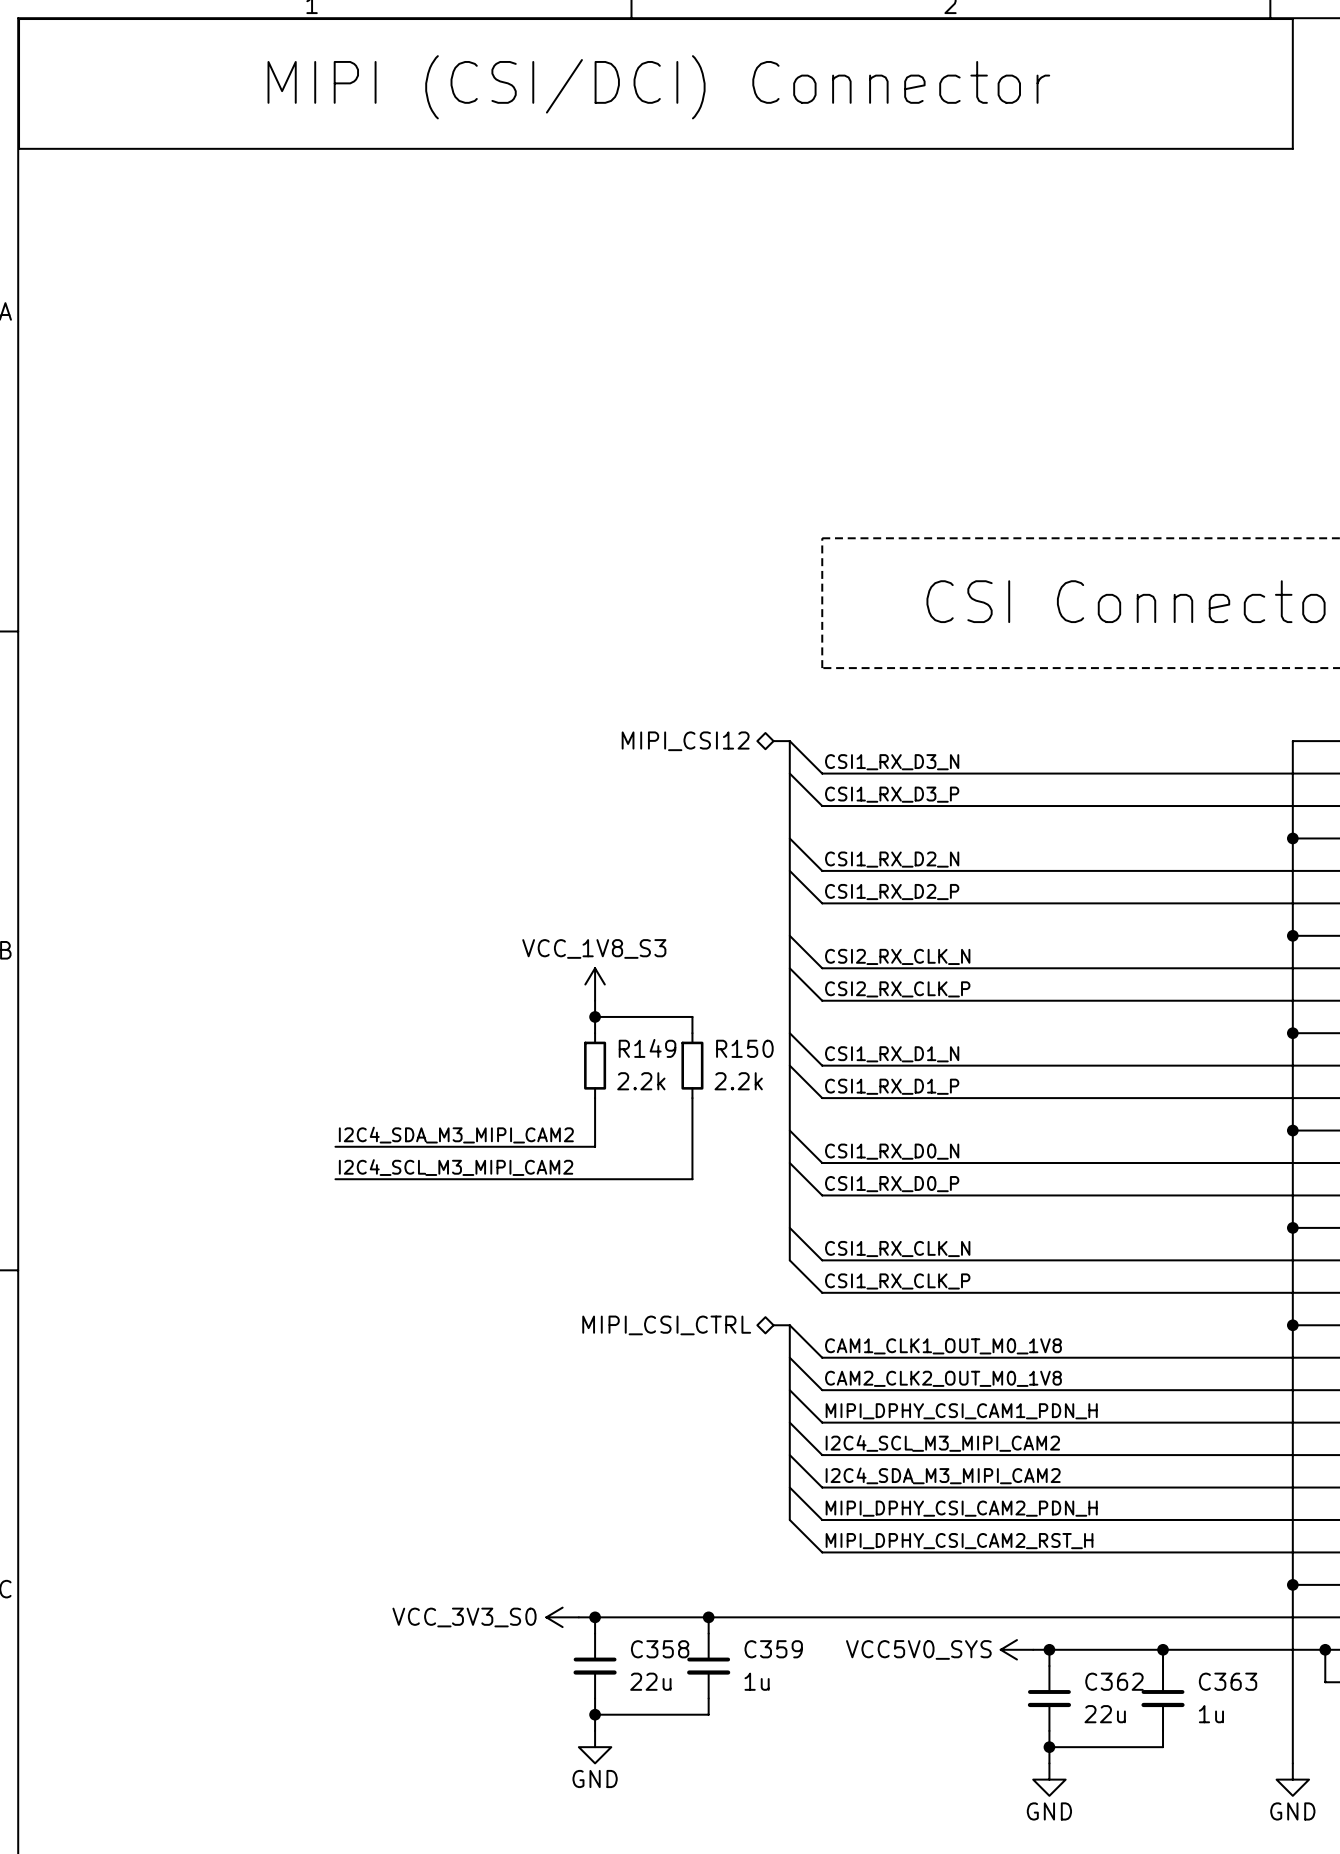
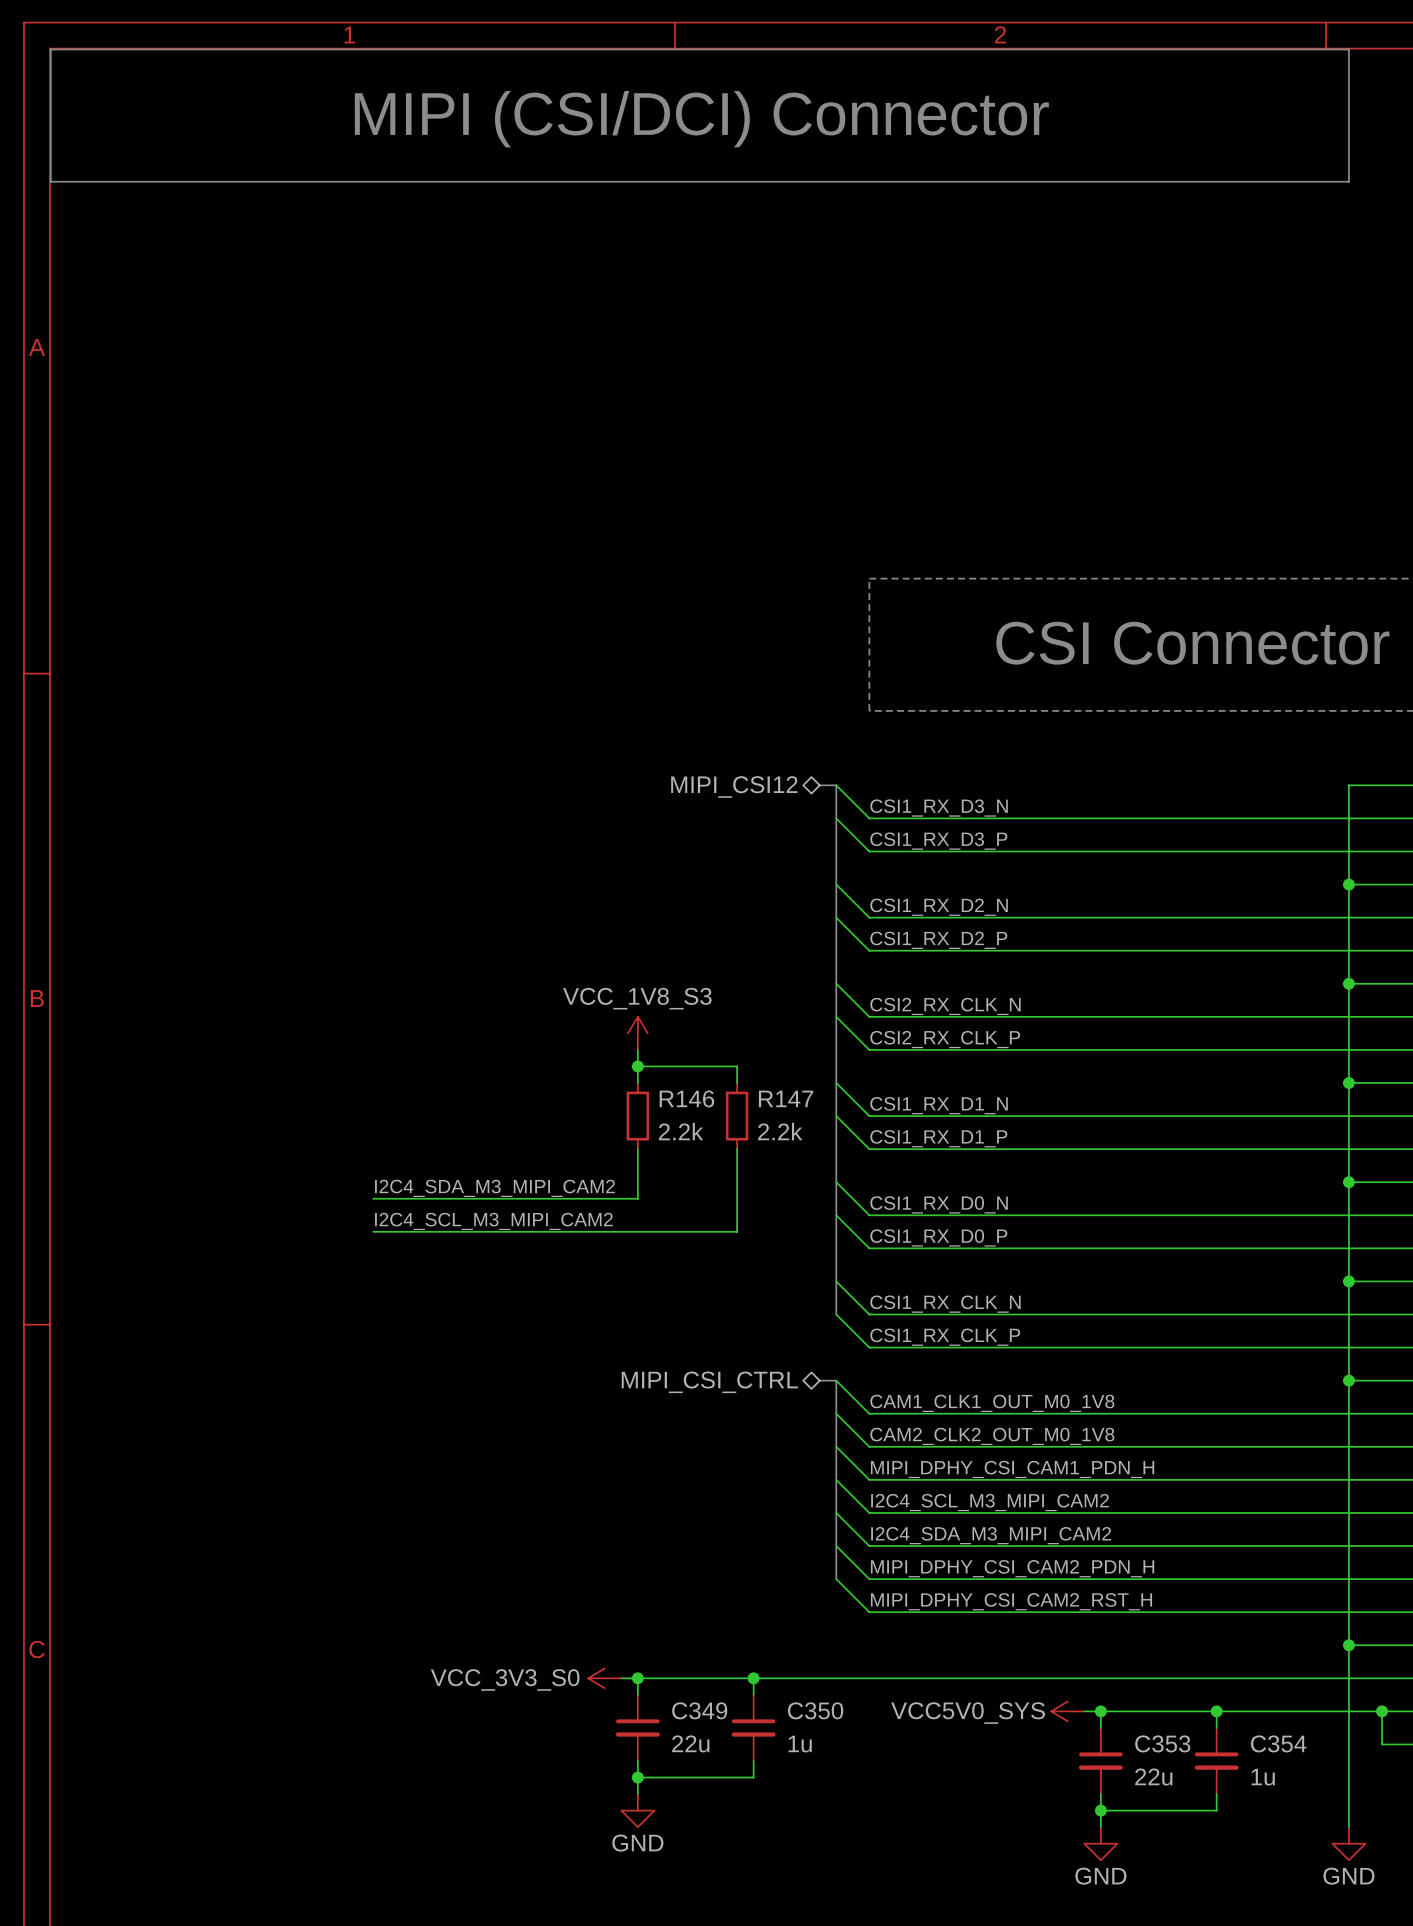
R149 name: R149 (647, 1048) -> R146 (686, 1098)
R150 name: R150 (744, 1048) -> R147 (786, 1098)
C358 name: C358 (660, 1649) -> C349 (699, 1710)
C359 name: C359 (773, 1649) -> C350 (815, 1710)
C362 name: C362 (1114, 1681) -> C353 (1162, 1743)
C363 name: C363 (1228, 1681) -> C354 (1278, 1743)

